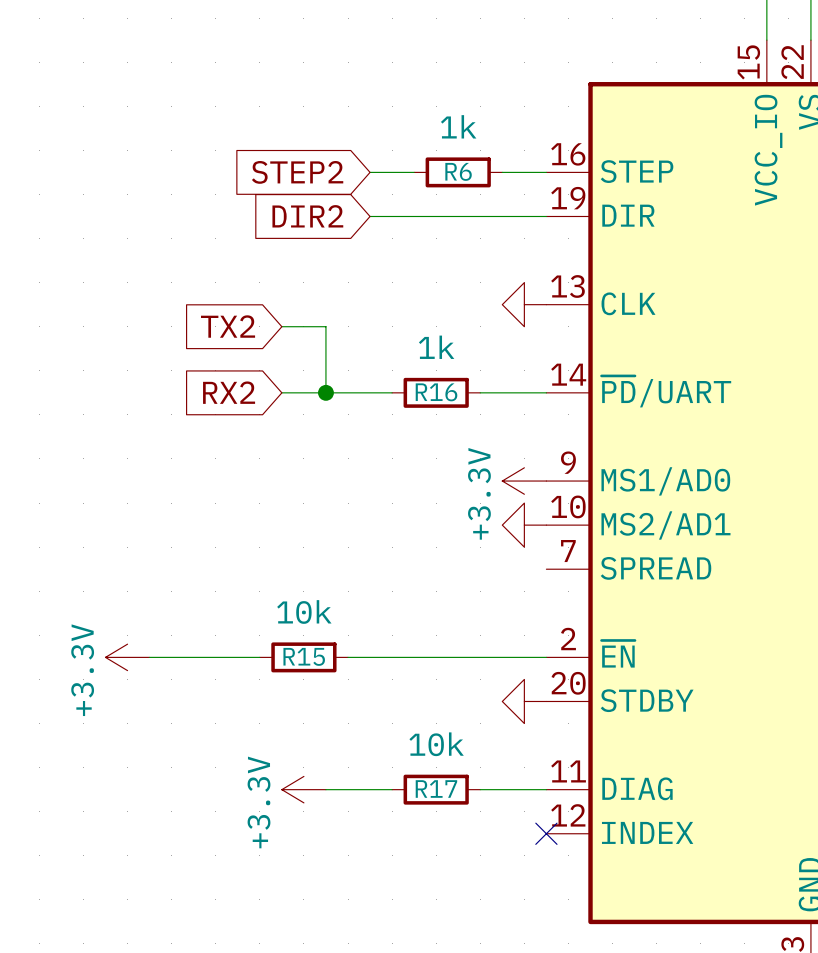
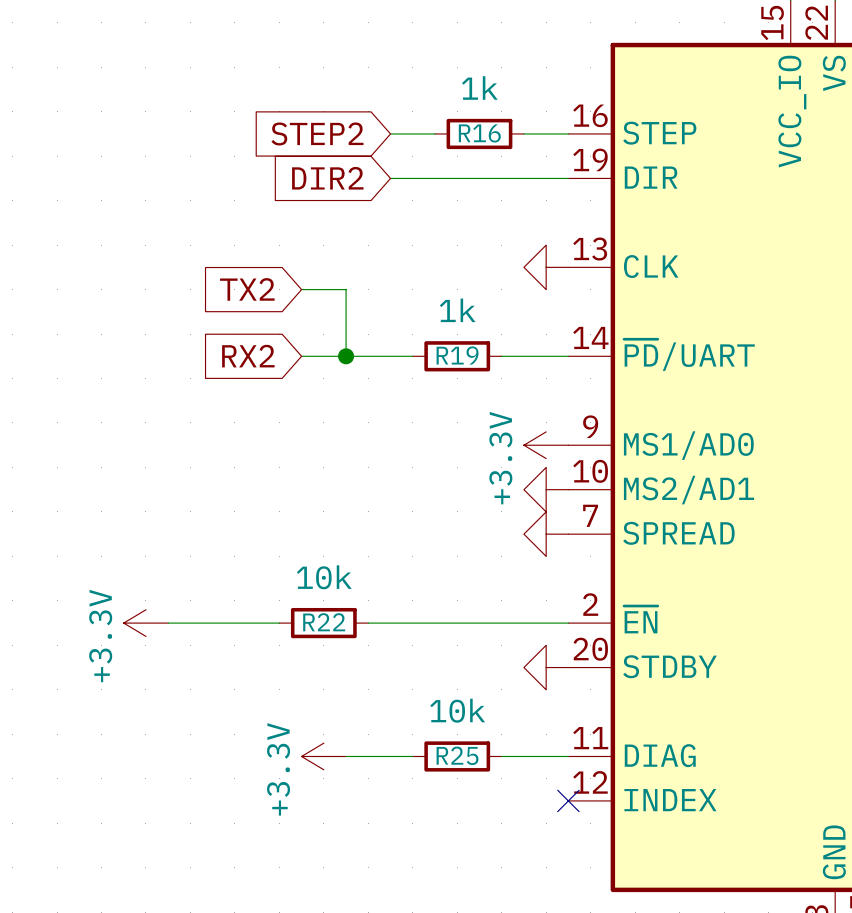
R6 name: R6 (458, 171) -> R16 (479, 133)
R16 name: R16 (436, 392) -> R19 (457, 355)
power symbol: none -> (546, 534)
R15 name: R15 (304, 656) -> R22 (324, 622)
R17 name: R17 (436, 789) -> R25 (457, 755)

